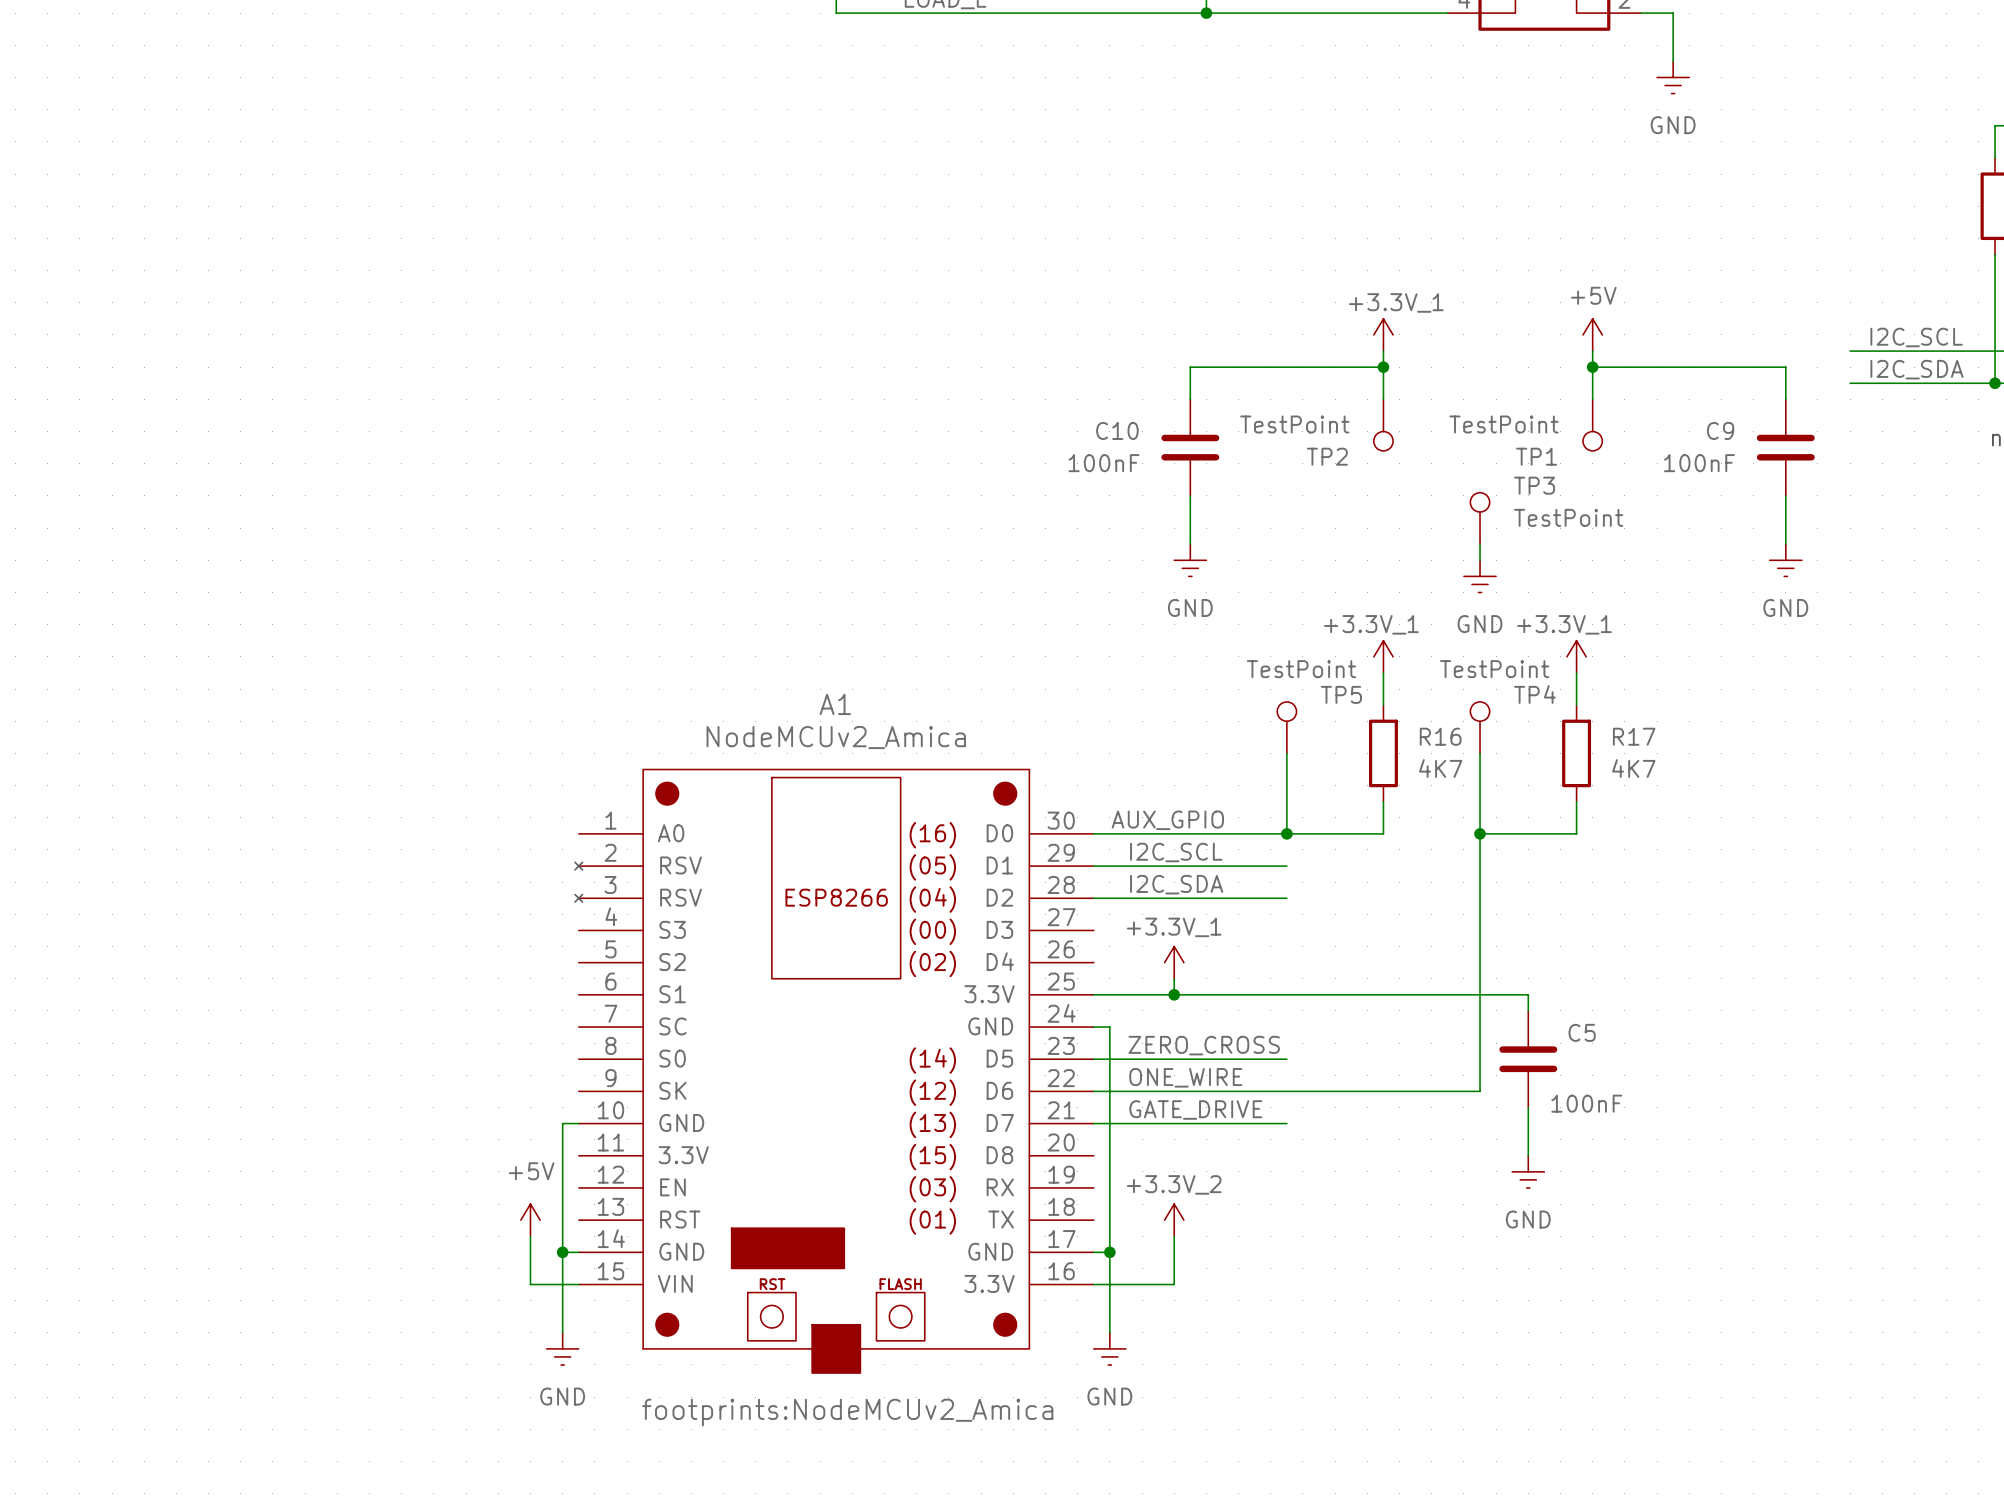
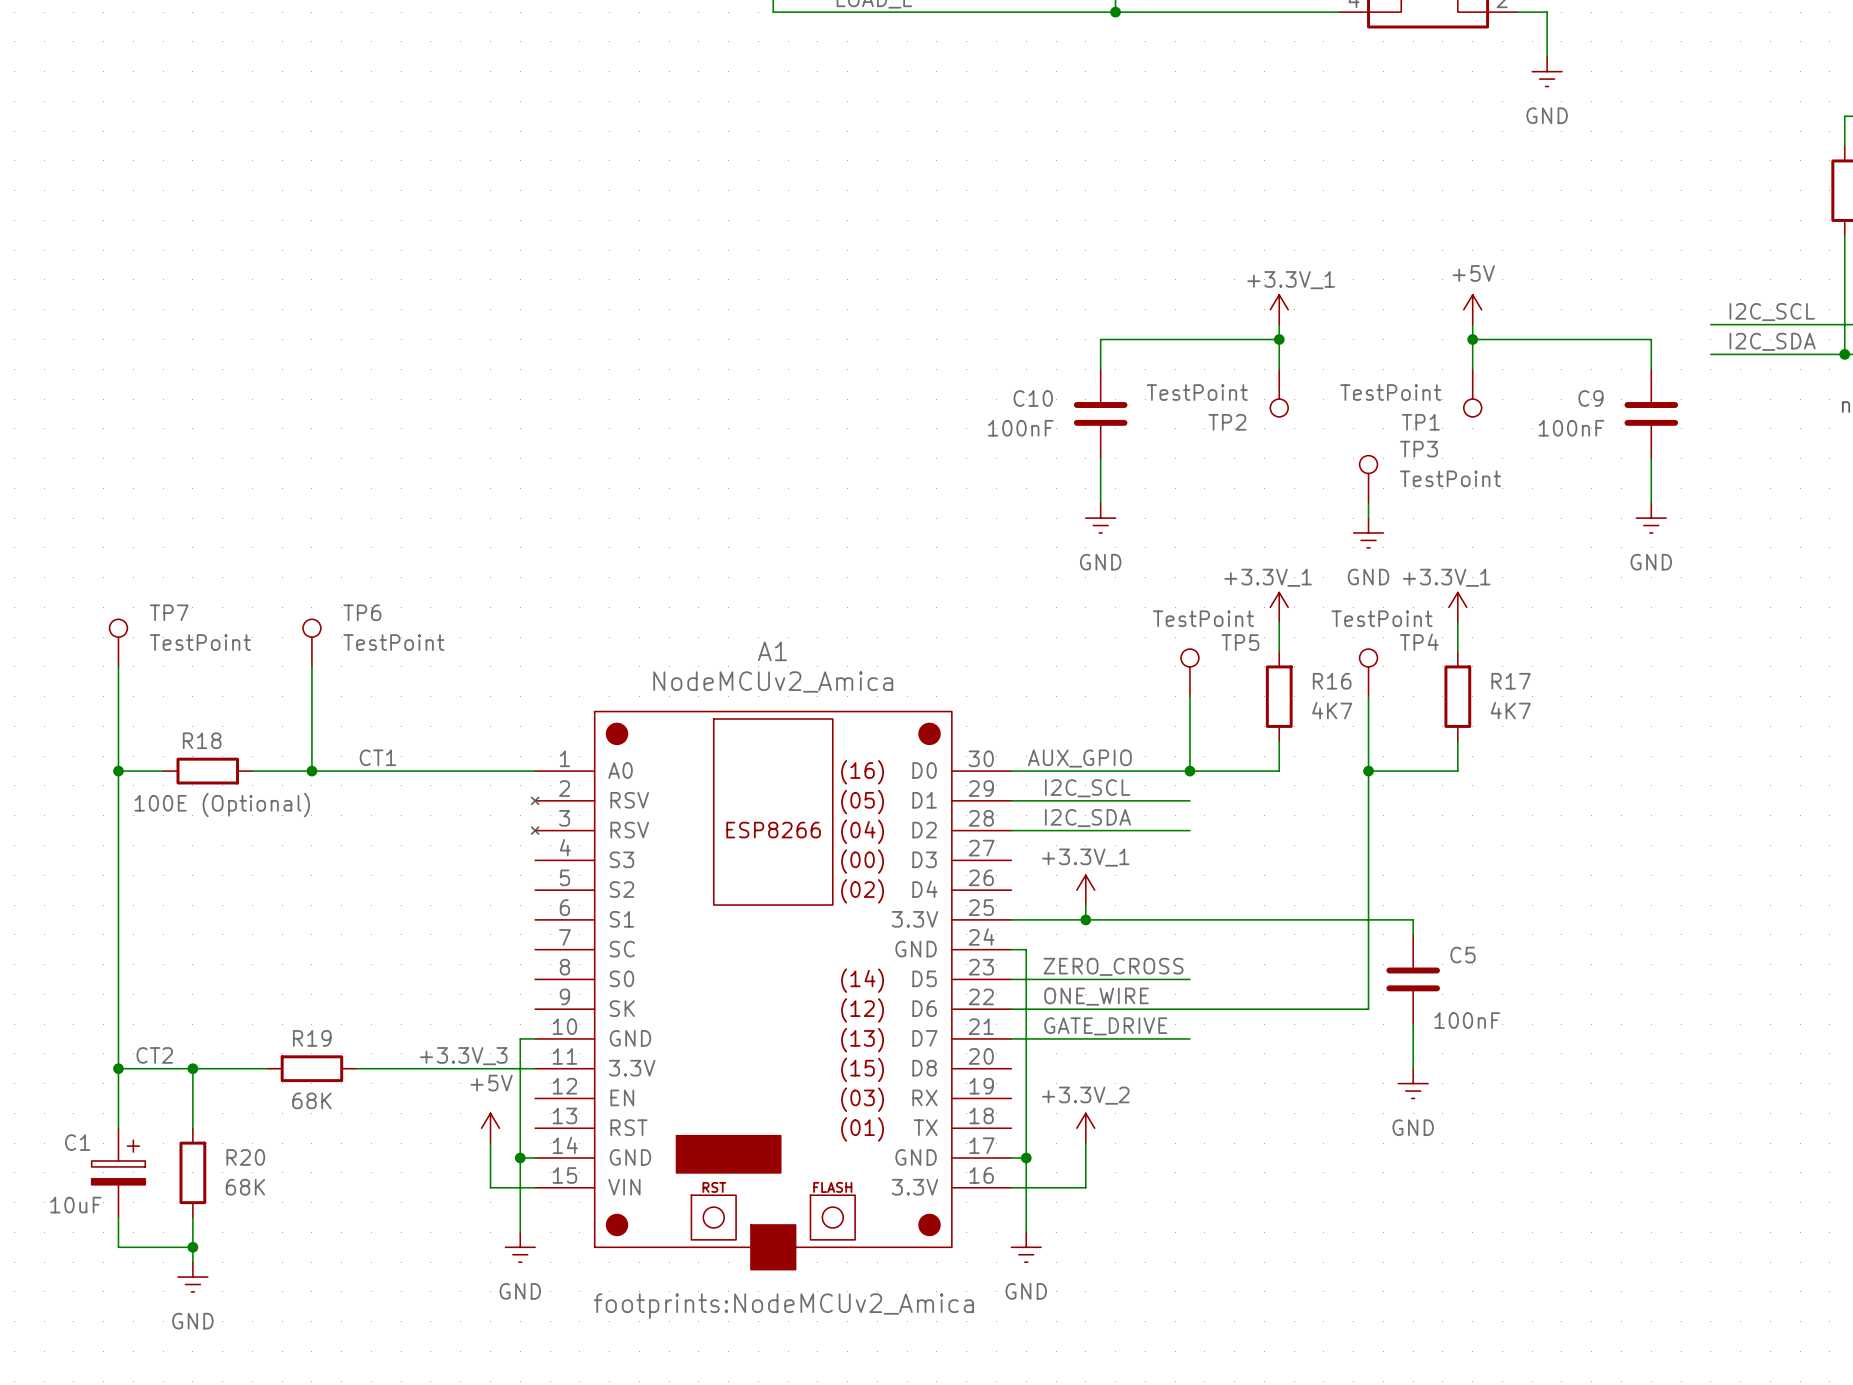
TP7: none -> TestPoint (118, 643)
TP6: none -> TestPoint (311, 643)
wire: none -> (118, 666) (118, 1128)
wire: none -> (311, 666) (311, 771)
label: none -> CT1 (377, 757)
wire: none -> (118, 771) (163, 771)
junction: none -> (118, 771)
R18: none -> 100E (Optional) (207, 771)
wire: none -> (252, 771) (535, 771)
junction: none -> (311, 771)
label: none -> CT2 (154, 1055)
label: none -> +3.3V_3 (463, 1056)
wire: none -> (118, 1068) (267, 1068)
junction: none -> (118, 1068)
wire: none -> (192, 1068) (192, 1128)
junction: none -> (192, 1068)
R19: none -> 68K (311, 1068)
wire: none -> (356, 1068) (535, 1068)
C1: none -> 10uF (118, 1172)
R20: none -> 68K (192, 1172)
wire: none -> (118, 1217) (118, 1247) (192, 1247)
wire: none -> (192, 1217) (192, 1262)
junction: none -> (192, 1247)
power symbol: none -> GND (192, 1277)

